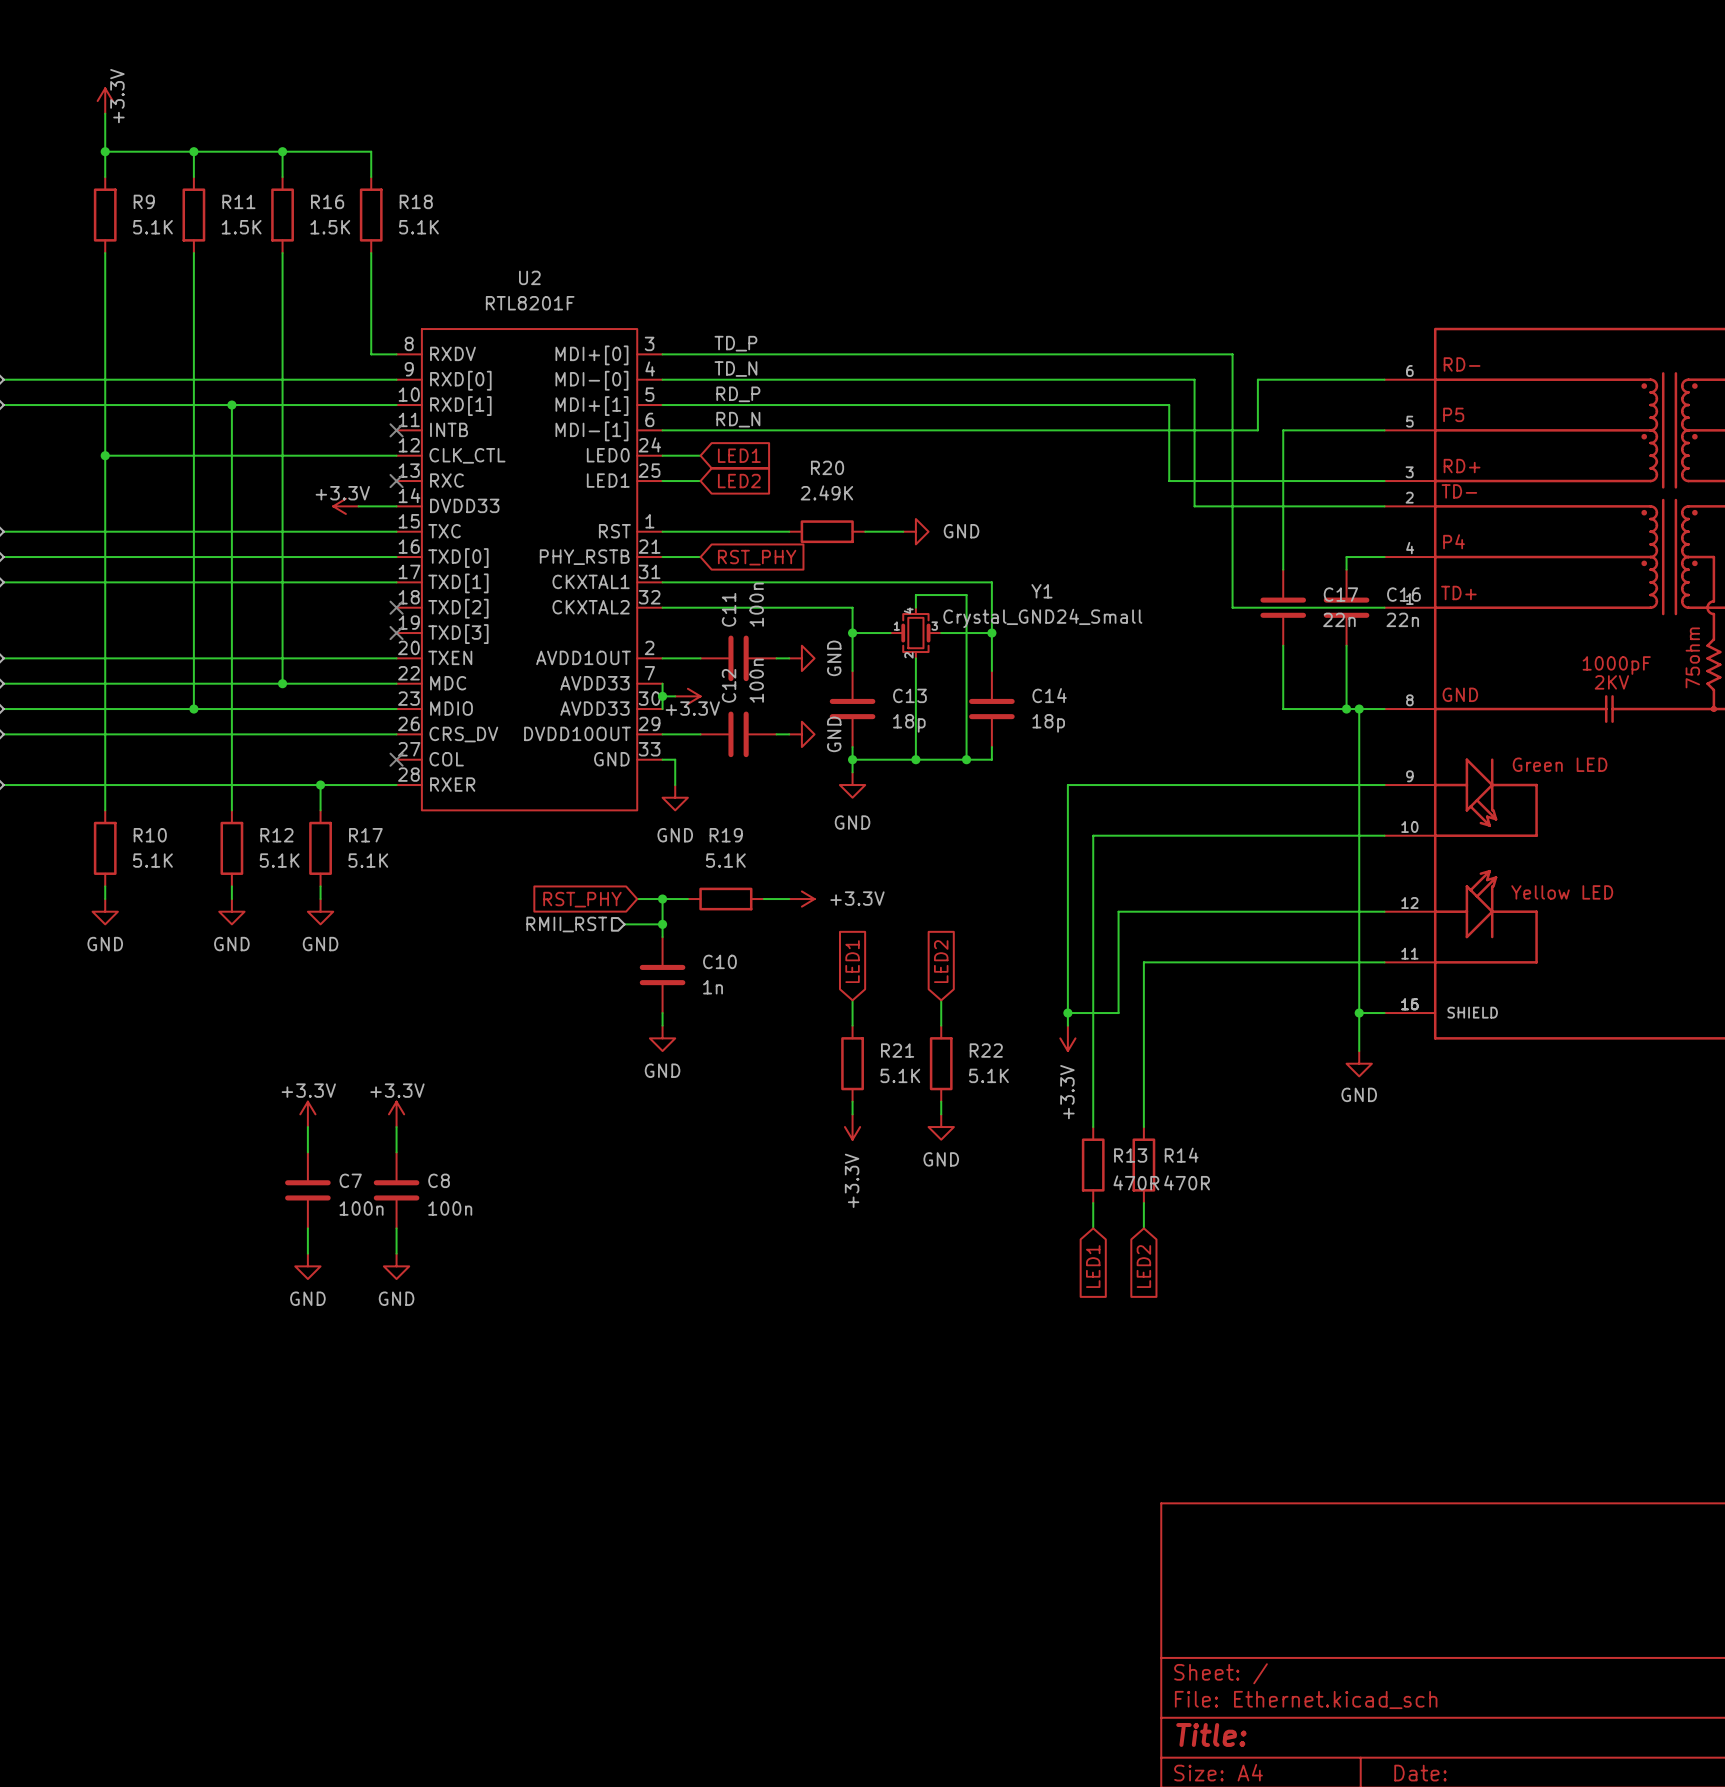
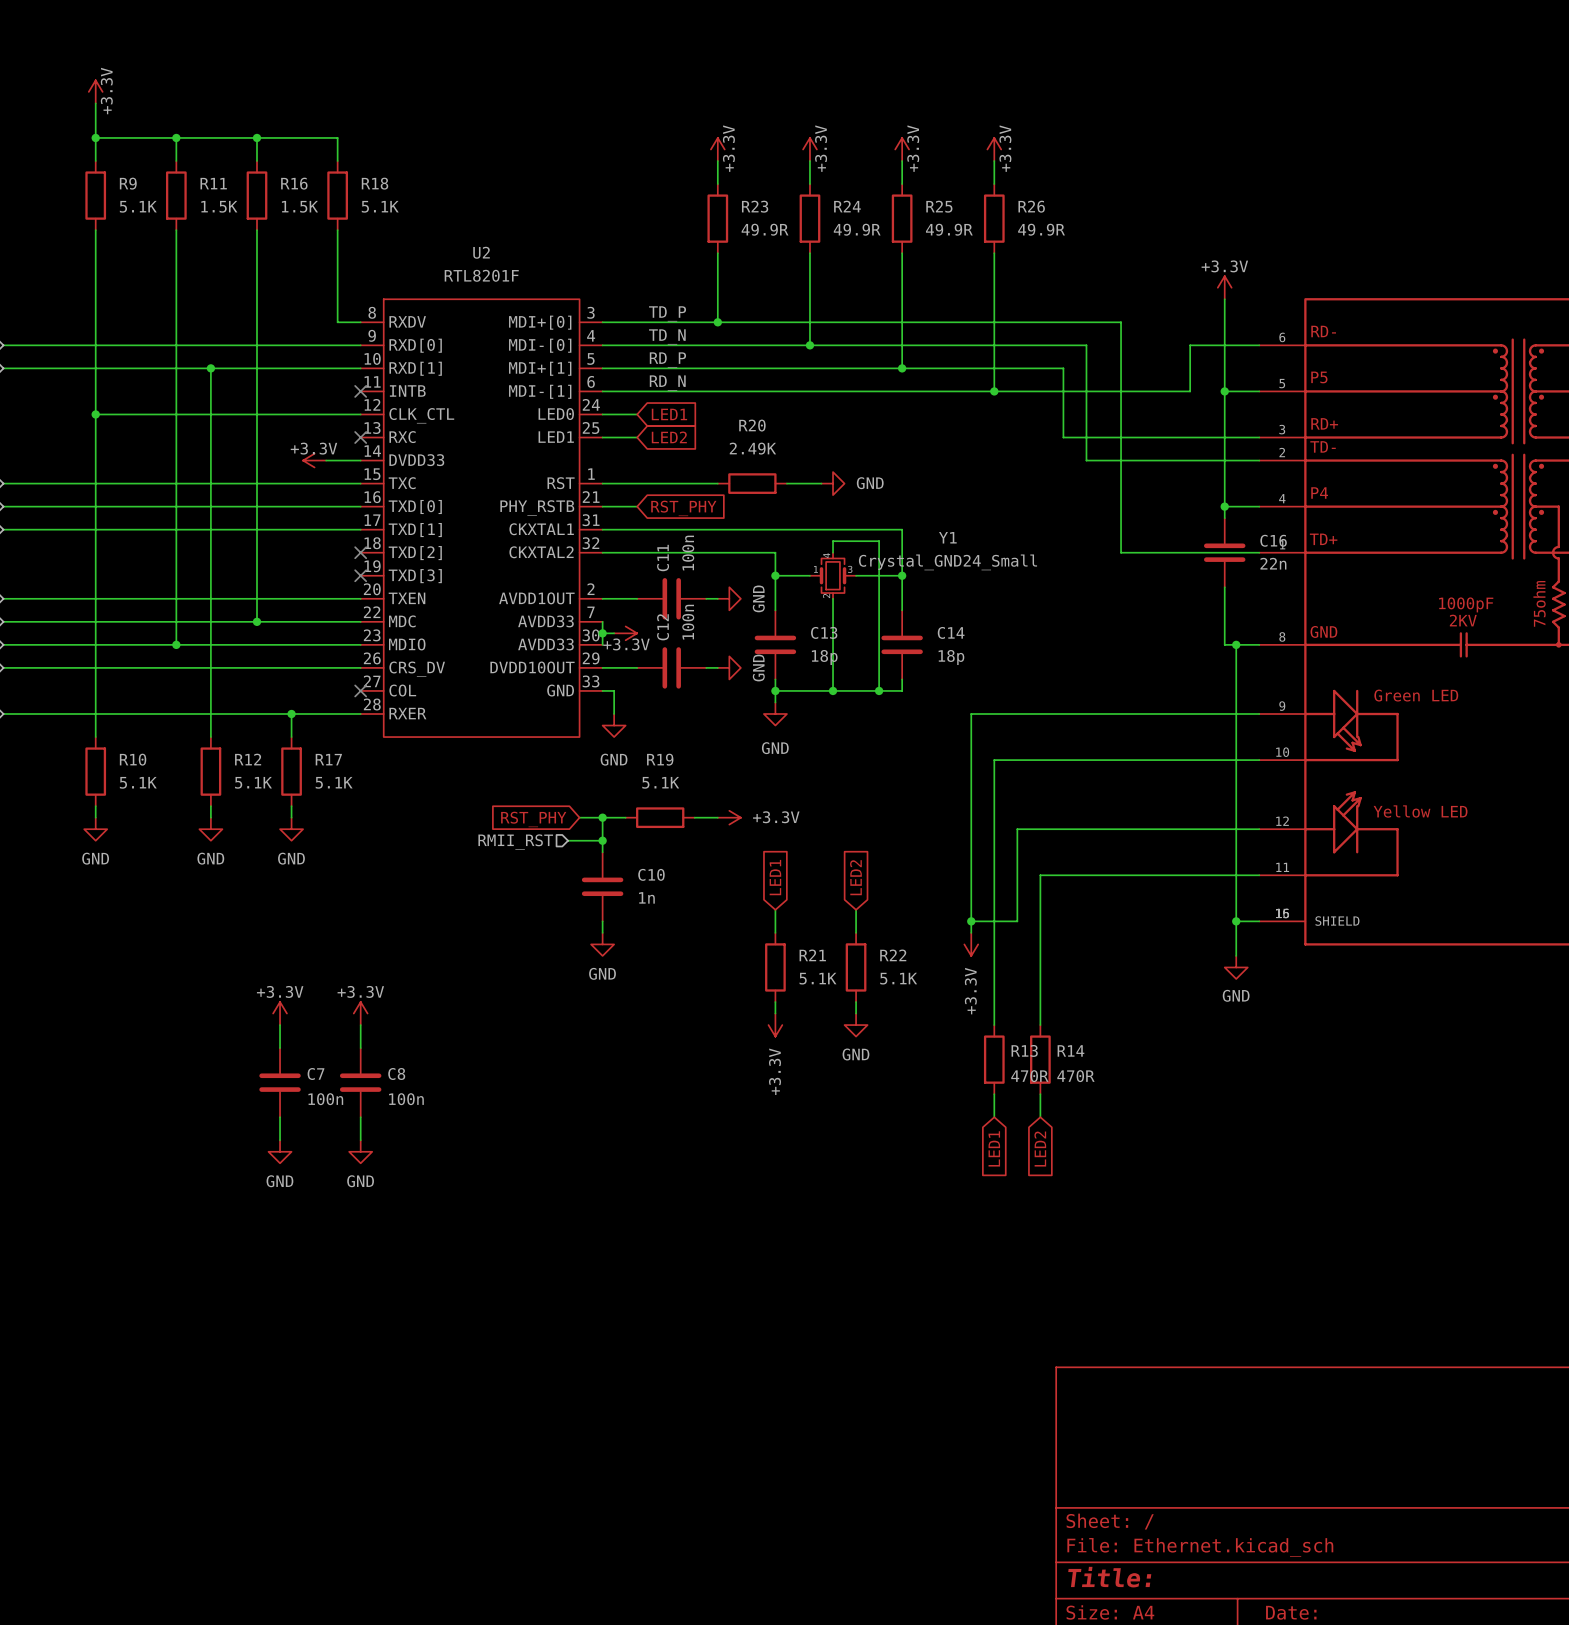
power symbol: none -> +3.3V (717, 149)
power symbol: none -> +3.3V (809, 149)
power symbol: none -> +3.3V (902, 149)
power symbol: none -> +3.3V (994, 149)
wire: none -> (717, 161) (717, 184)
wire: none -> (809, 161) (809, 184)
wire: none -> (902, 161) (902, 184)
wire: none -> (994, 161) (994, 184)
R23: none -> 49.9R (717, 218)
R24: none -> 49.9R (809, 218)
R25: none -> 49.9R (902, 218)
R26: none -> 49.9R (994, 218)
wire: none -> (717, 253) (717, 322)
wire: none -> (809, 253) (809, 345)
wire: none -> (902, 253) (902, 368)
wire: none -> (994, 253) (994, 391)
power symbol: none -> +3.3V (1224, 287)
wire: none -> (1224, 299) (1224, 506)
junction: none -> (717, 322)
junction: none -> (809, 345)
wire: (1308, 379) (1257, 379) (1257, 430) -> (1190, 345) (1190, 391)
junction: none -> (902, 368)
junction: none -> (994, 391)
wire: (1283, 430) (1283, 569) -> (1167, 391) (1144, 391)
wire: (1308, 430) (1346, 430) -> none
junction: none -> (1224, 391)
junction: none -> (1224, 506)
C17: 22n (1283, 607) -> none
wire: (1283, 645) (1283, 709) (1346, 709) -> none
junction: (1346, 709) -> none

